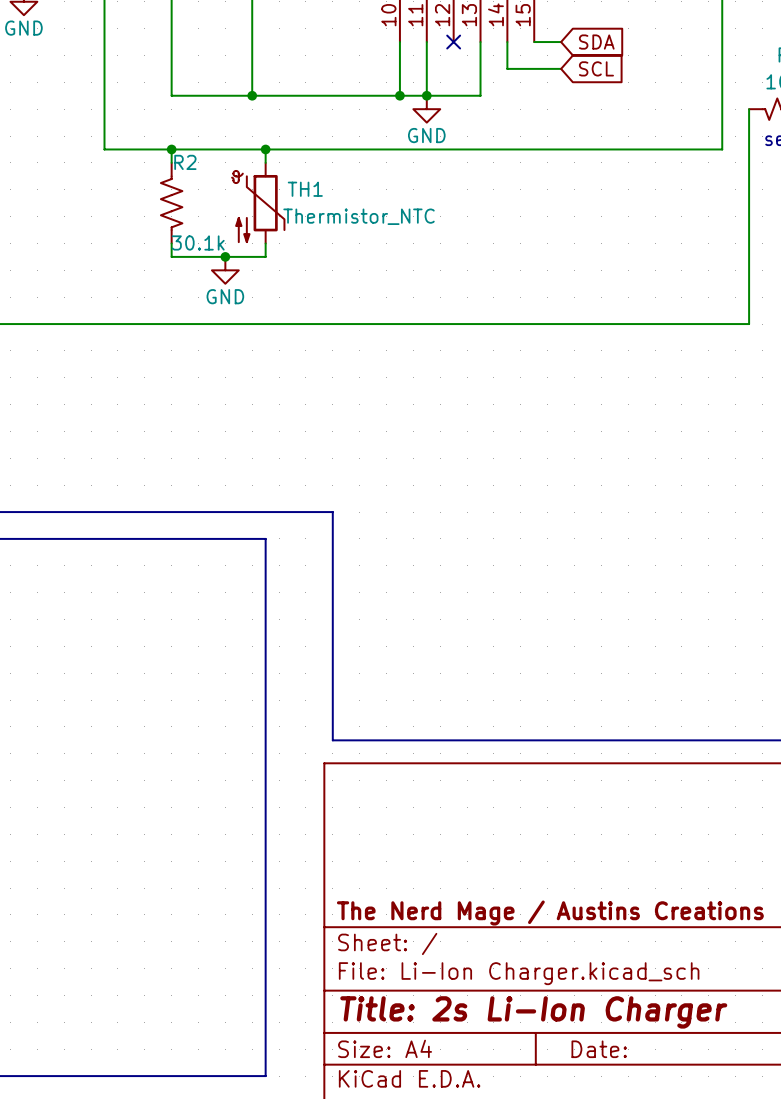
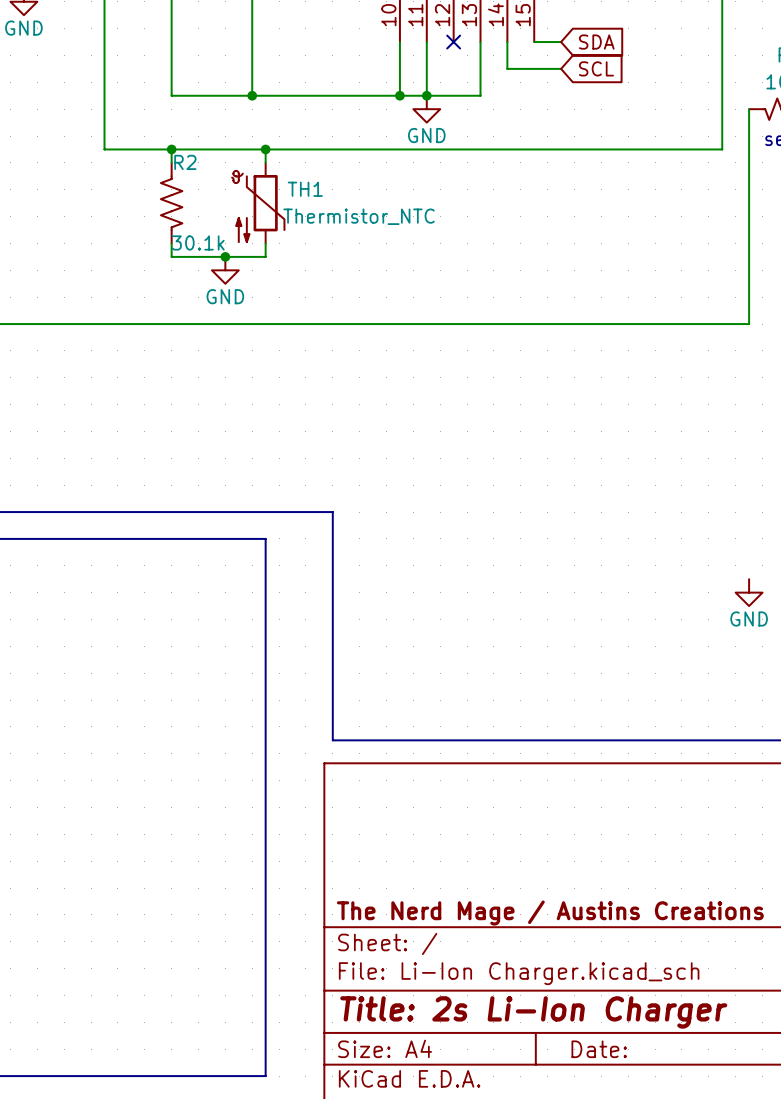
power symbol: none -> GND (749, 592)

